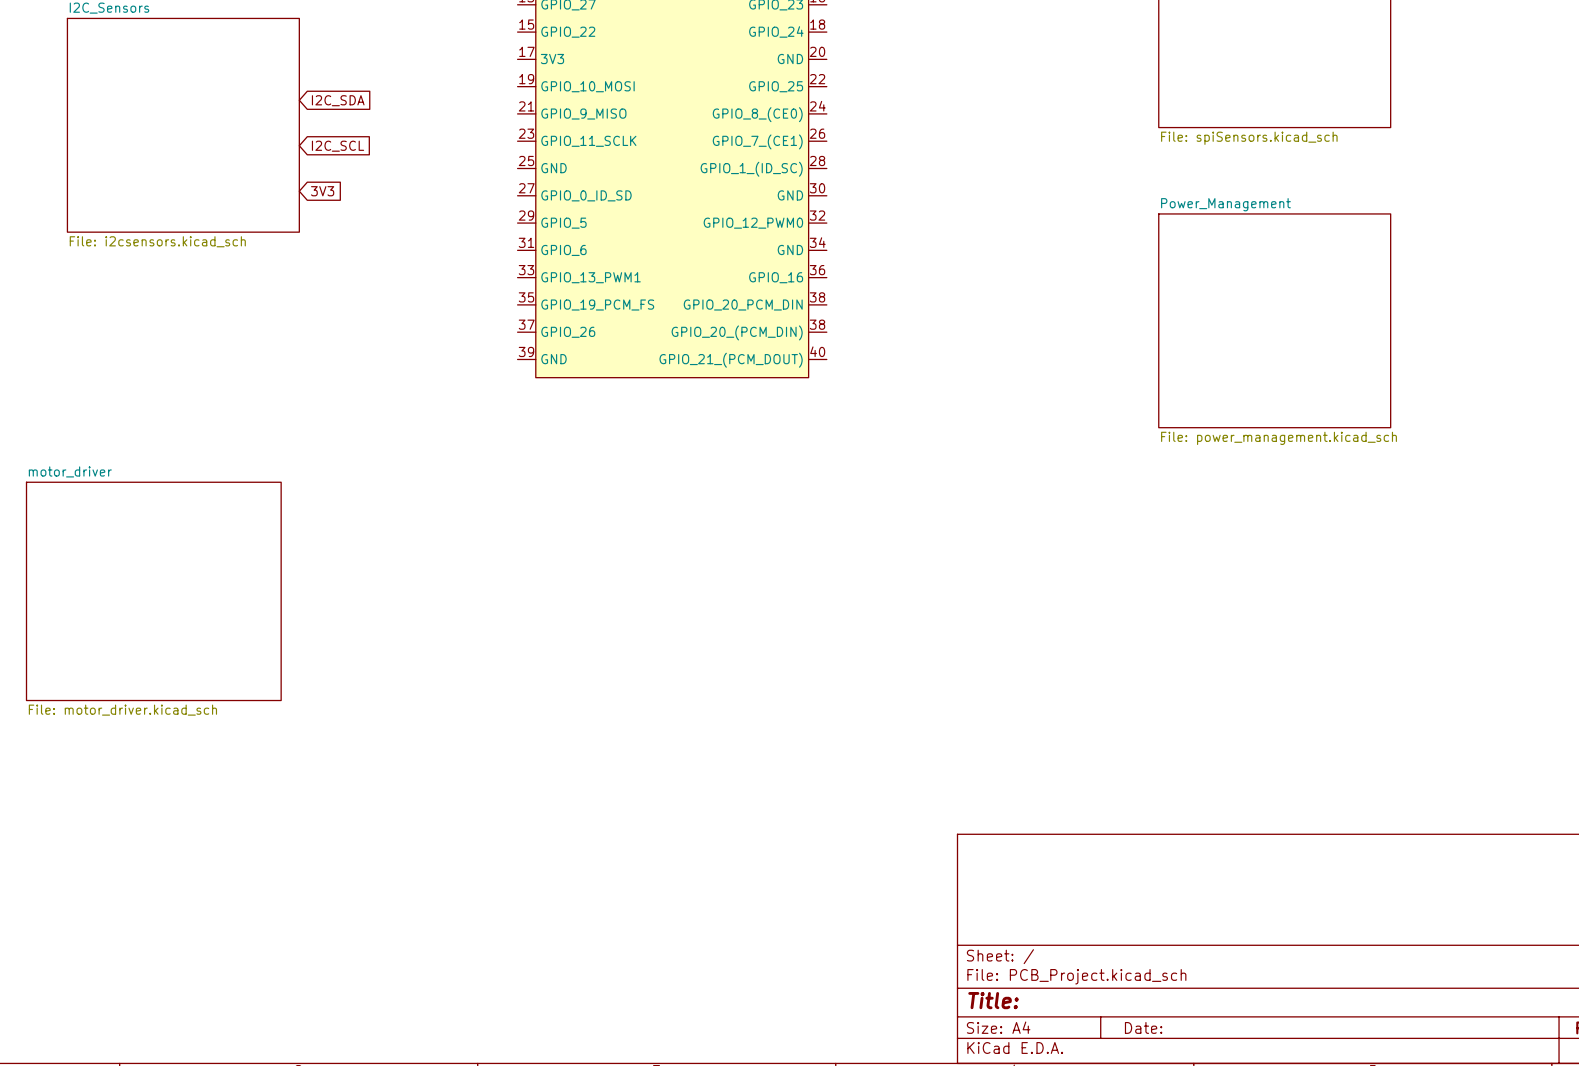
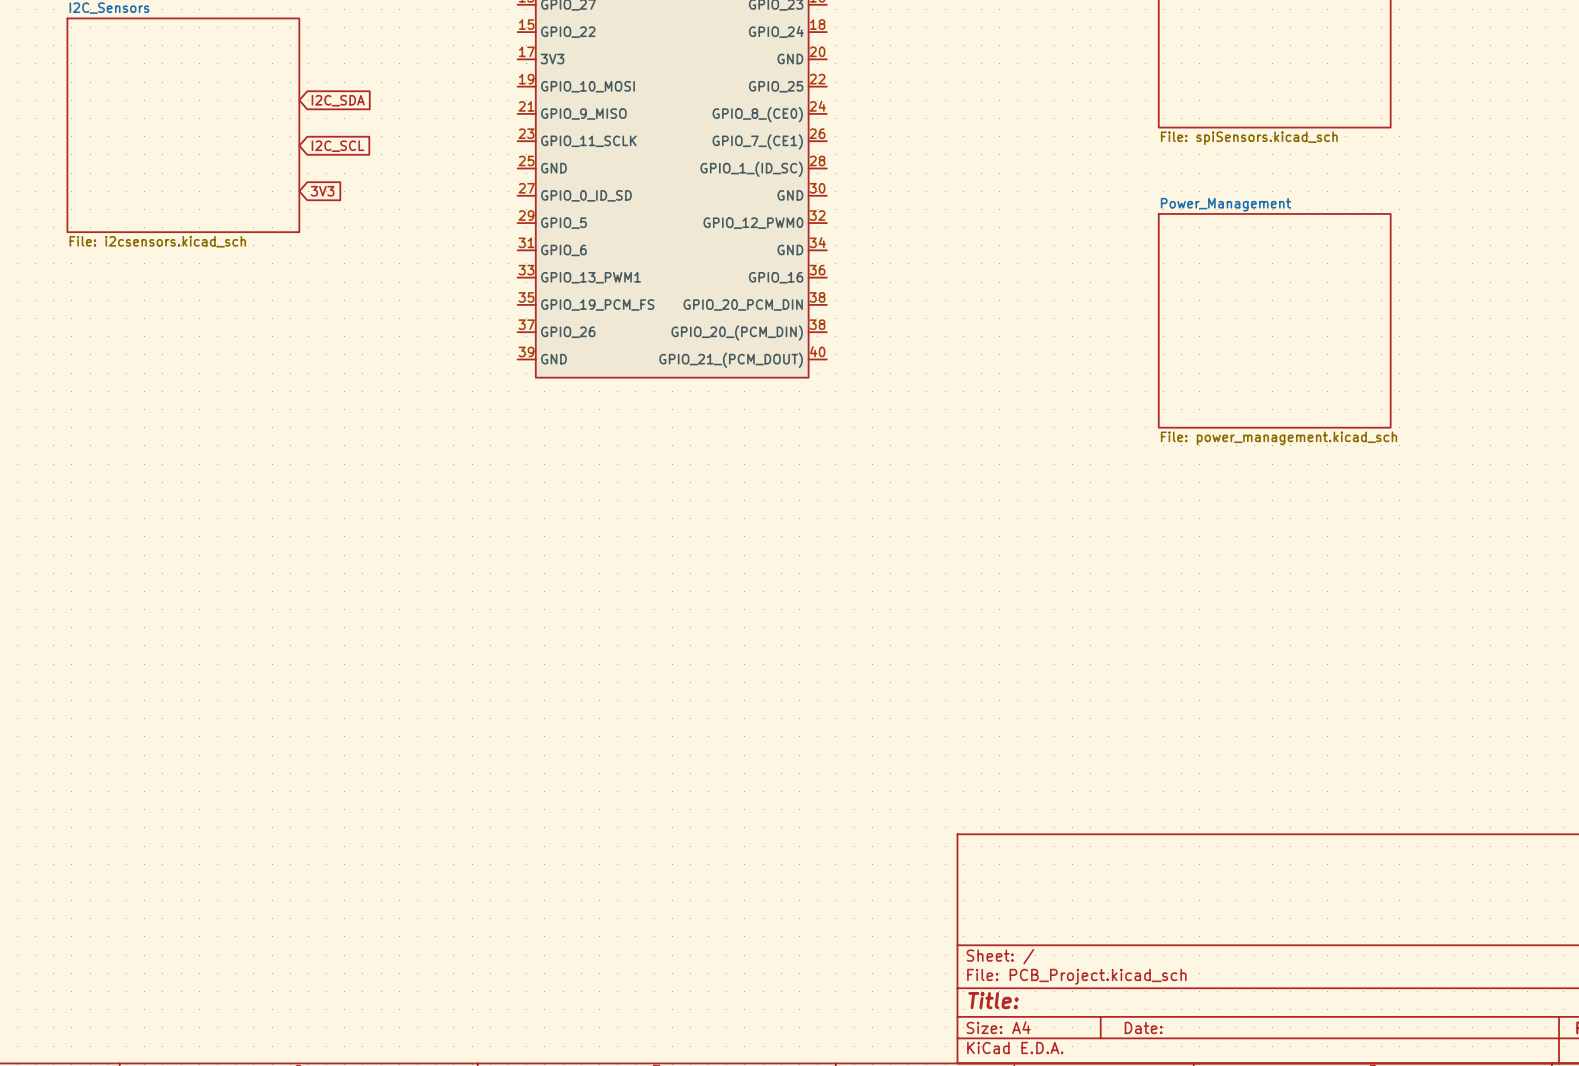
sheet motor_driver: File: motor_driver.kicad_sch (153, 591) -> none

